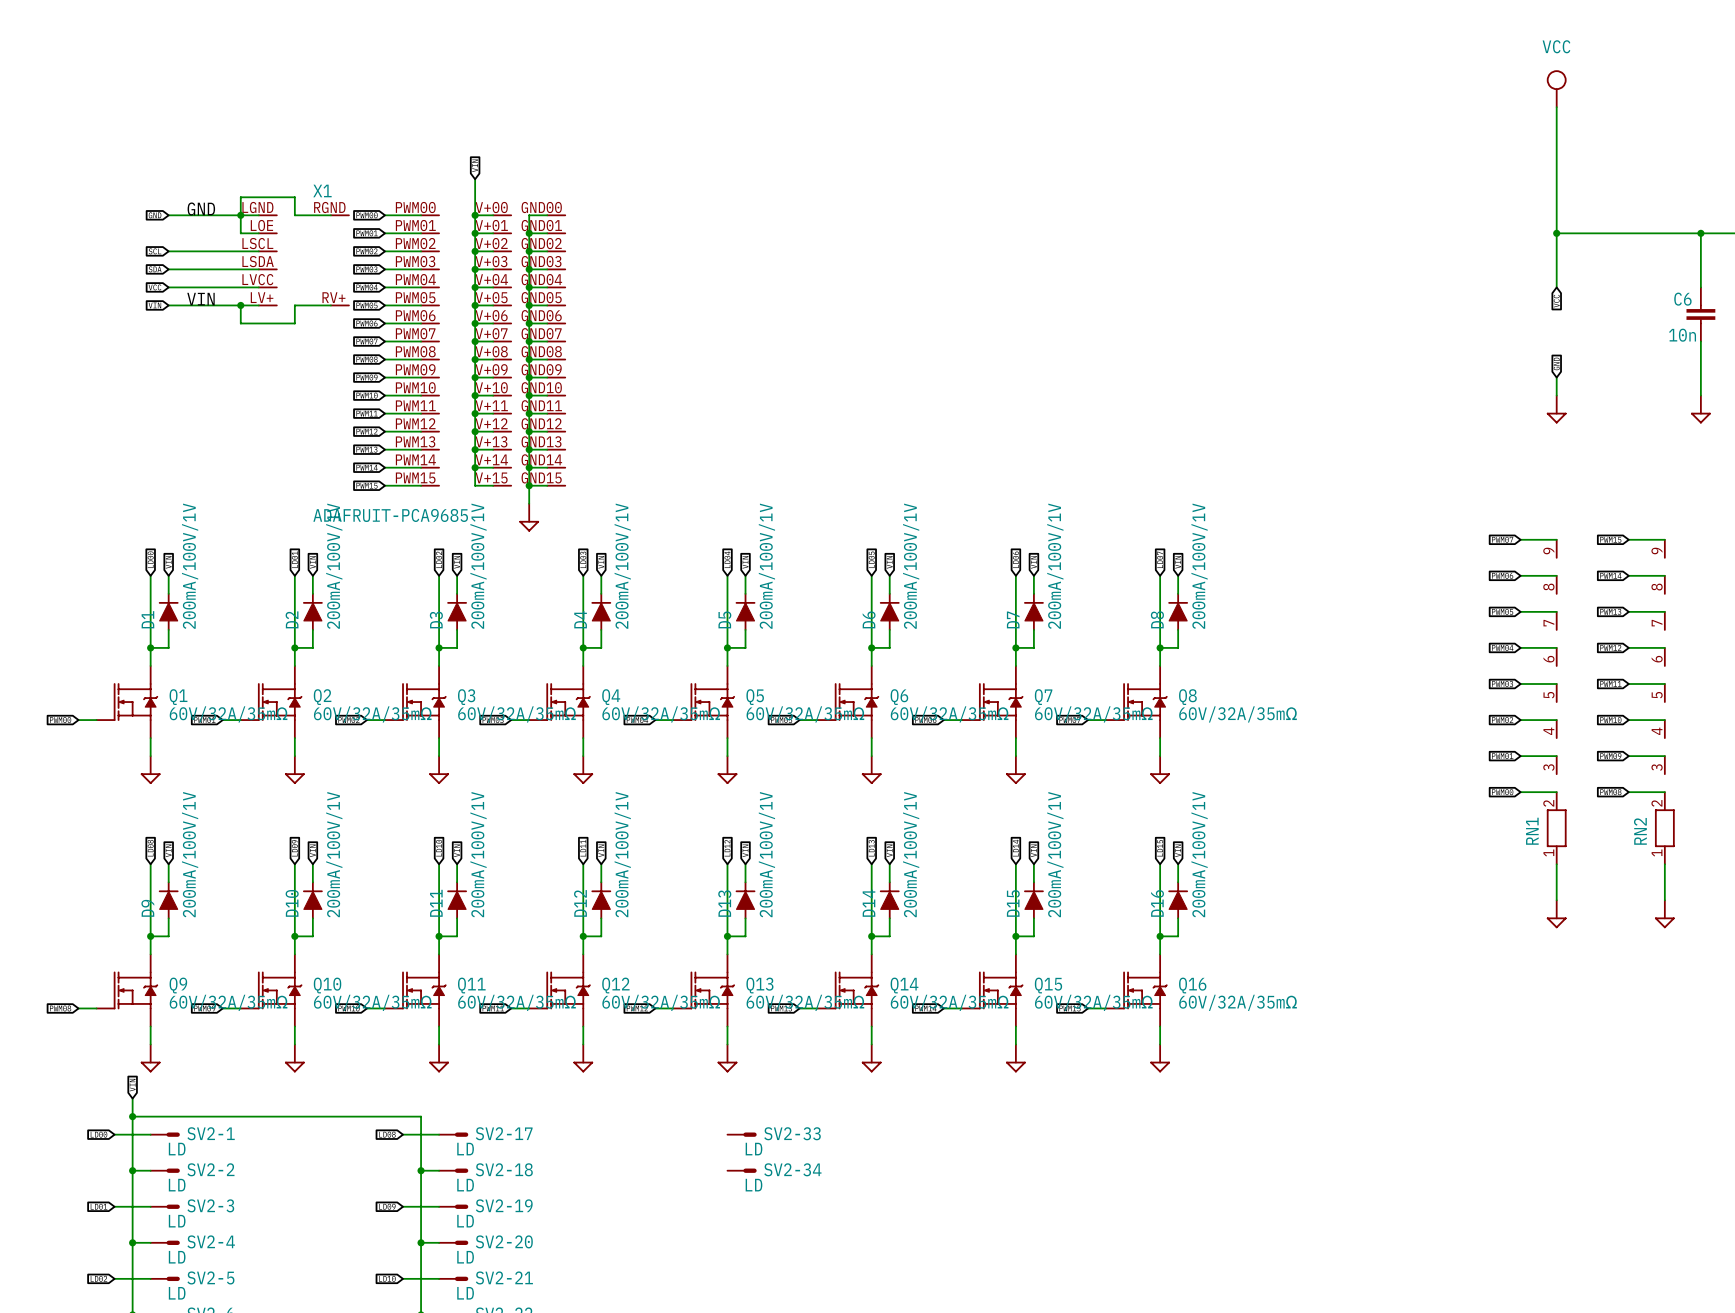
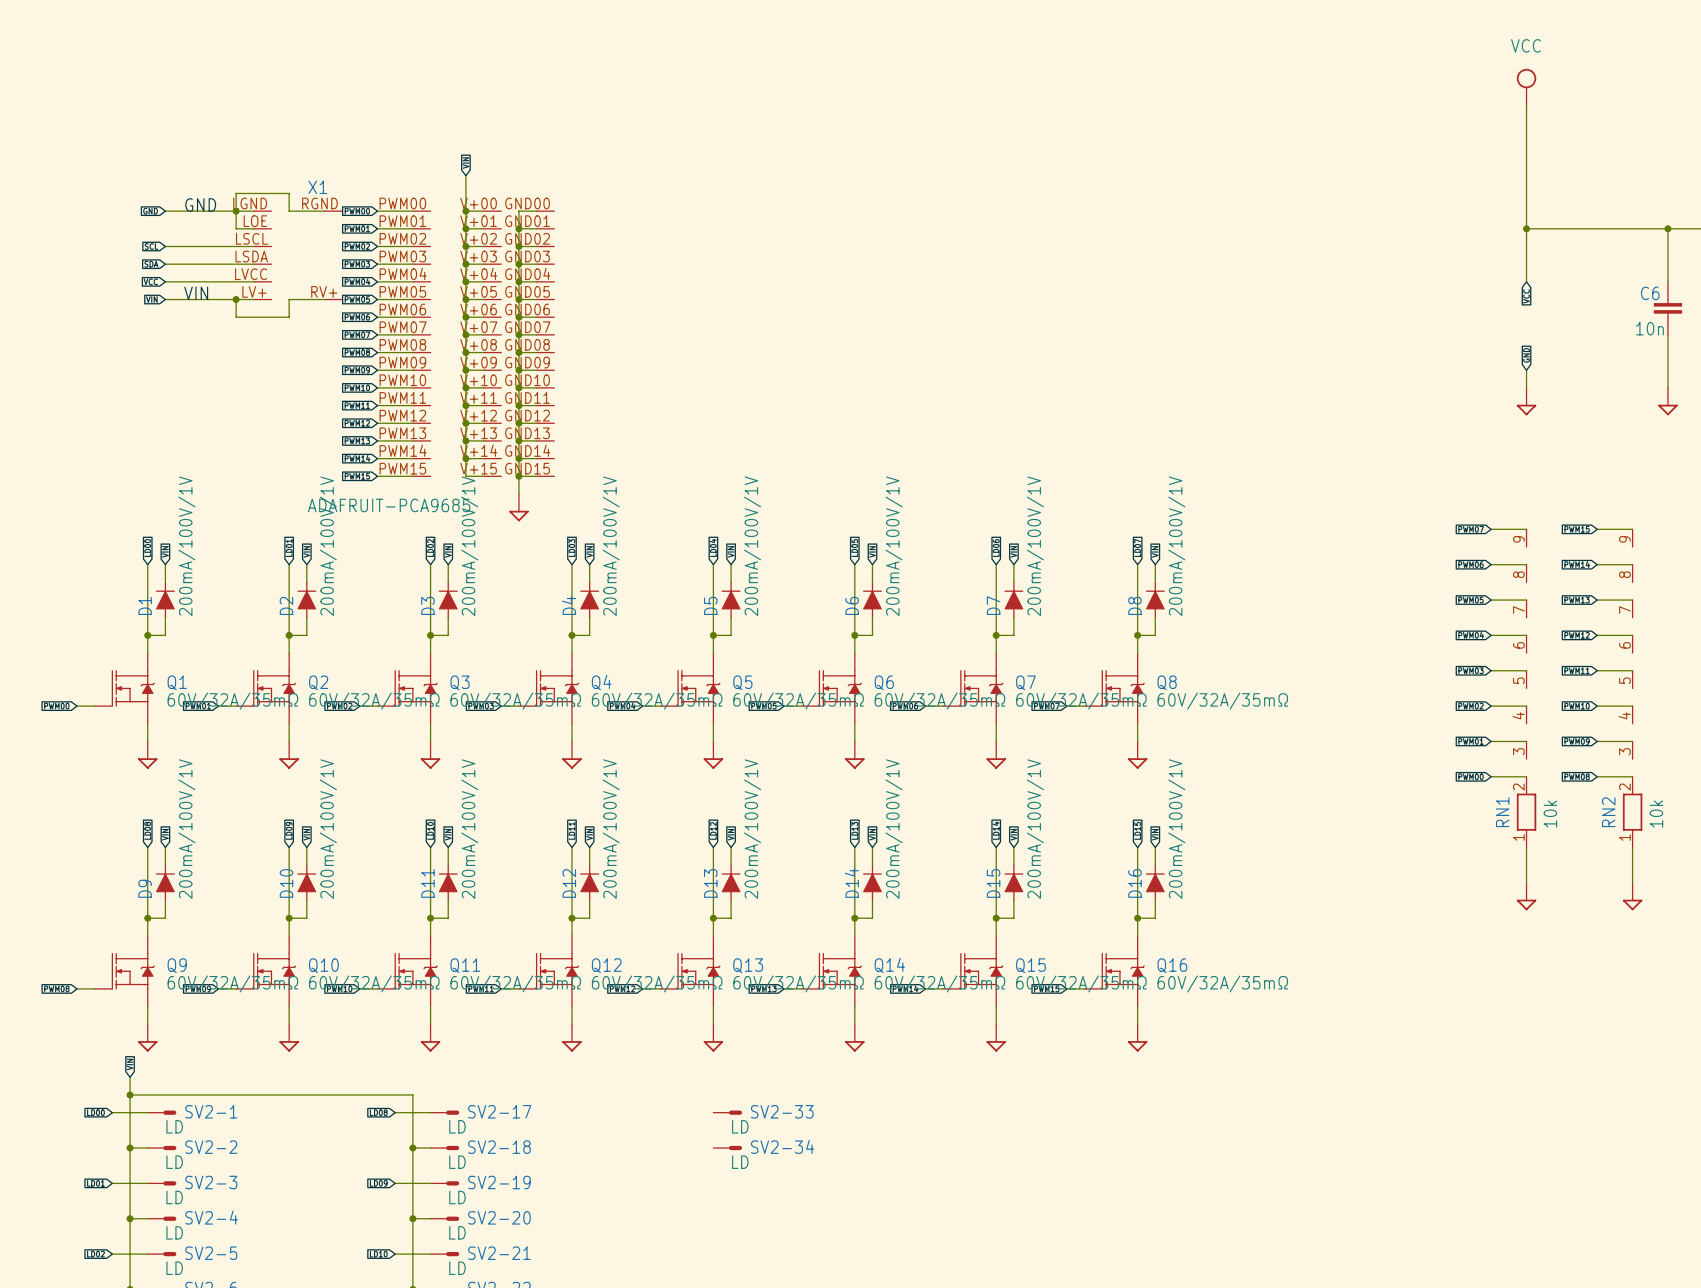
RN1 value: none -> 10k (1550, 814)
RN2 value: none -> 10k (1656, 814)

